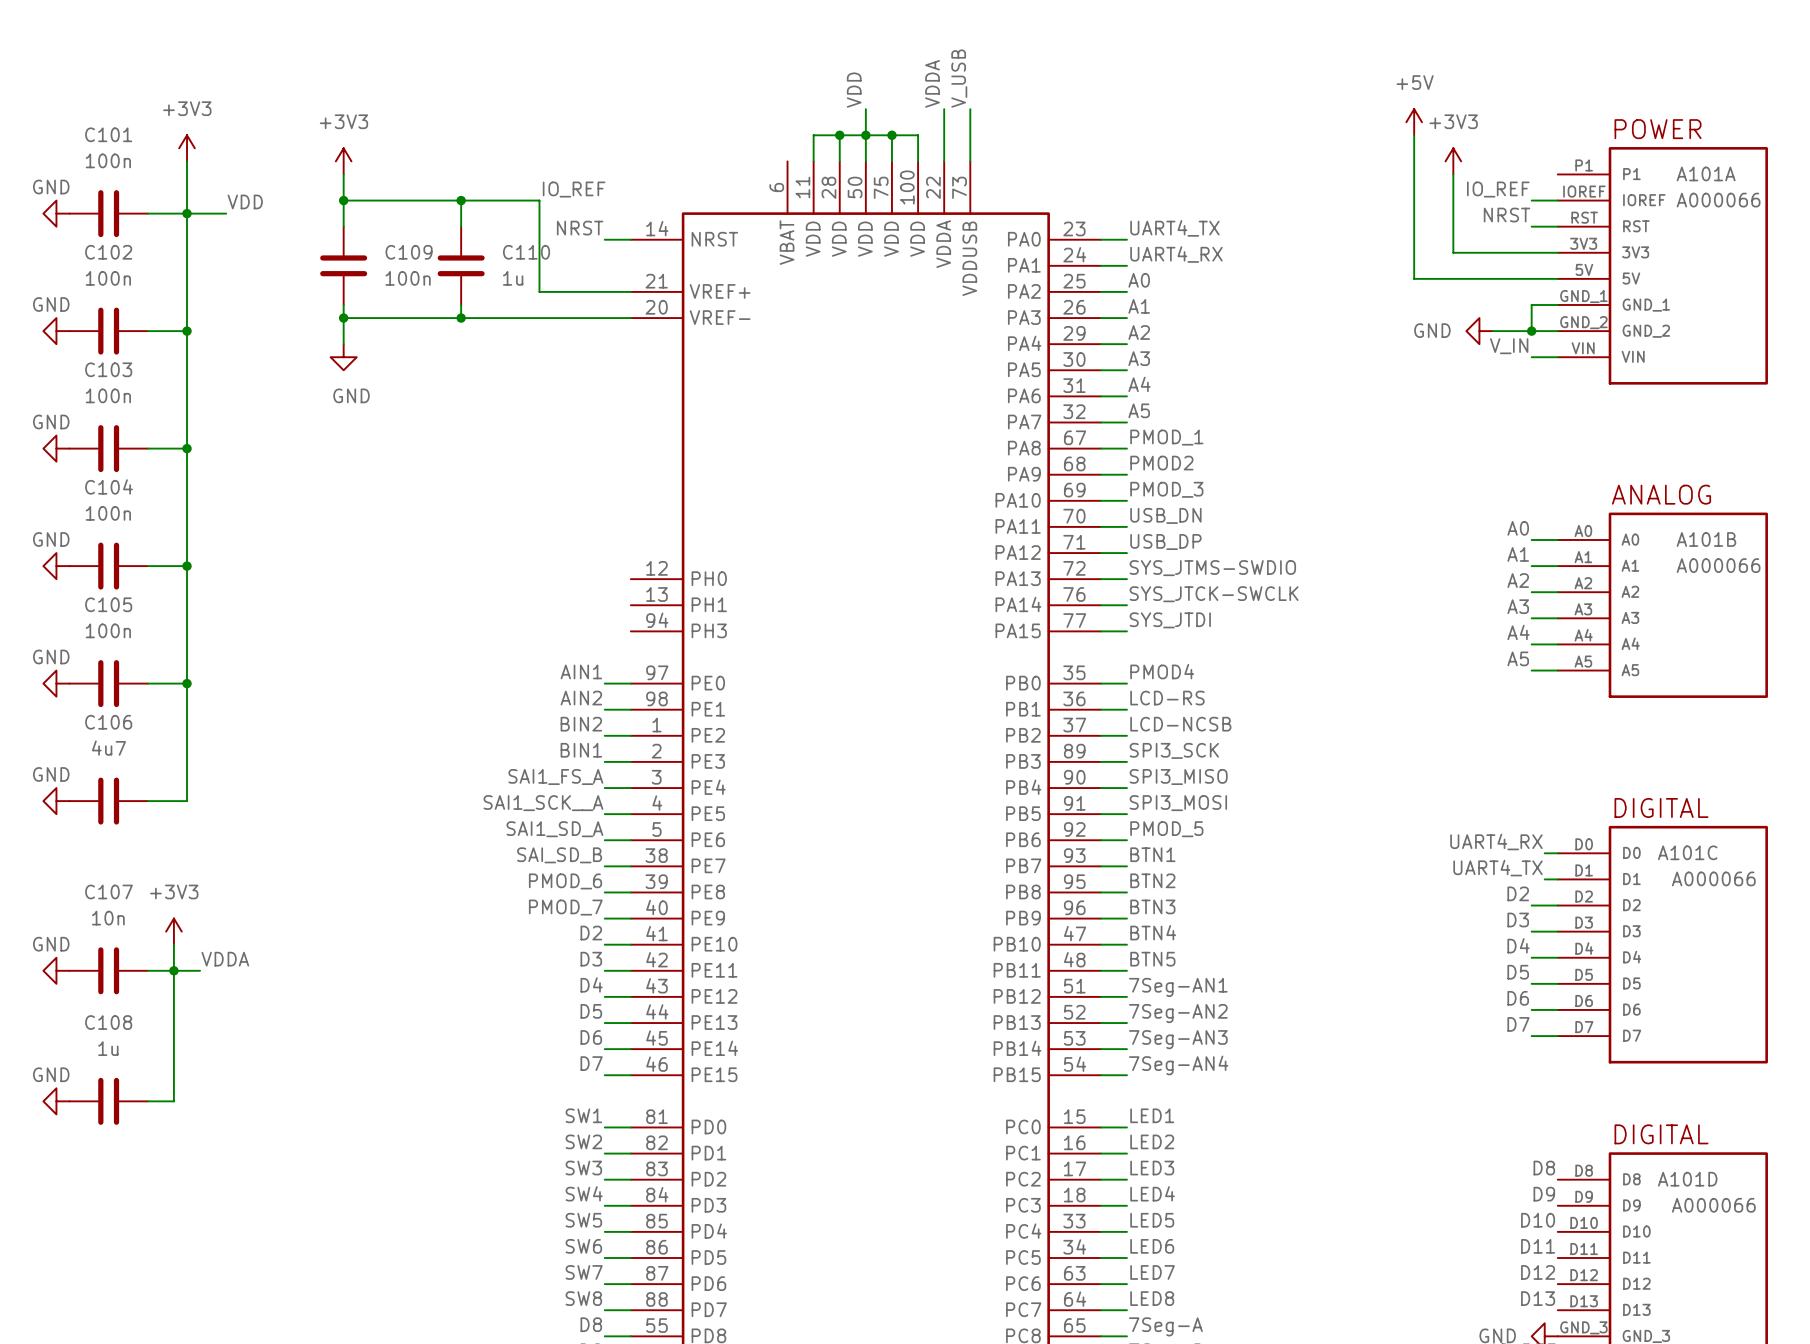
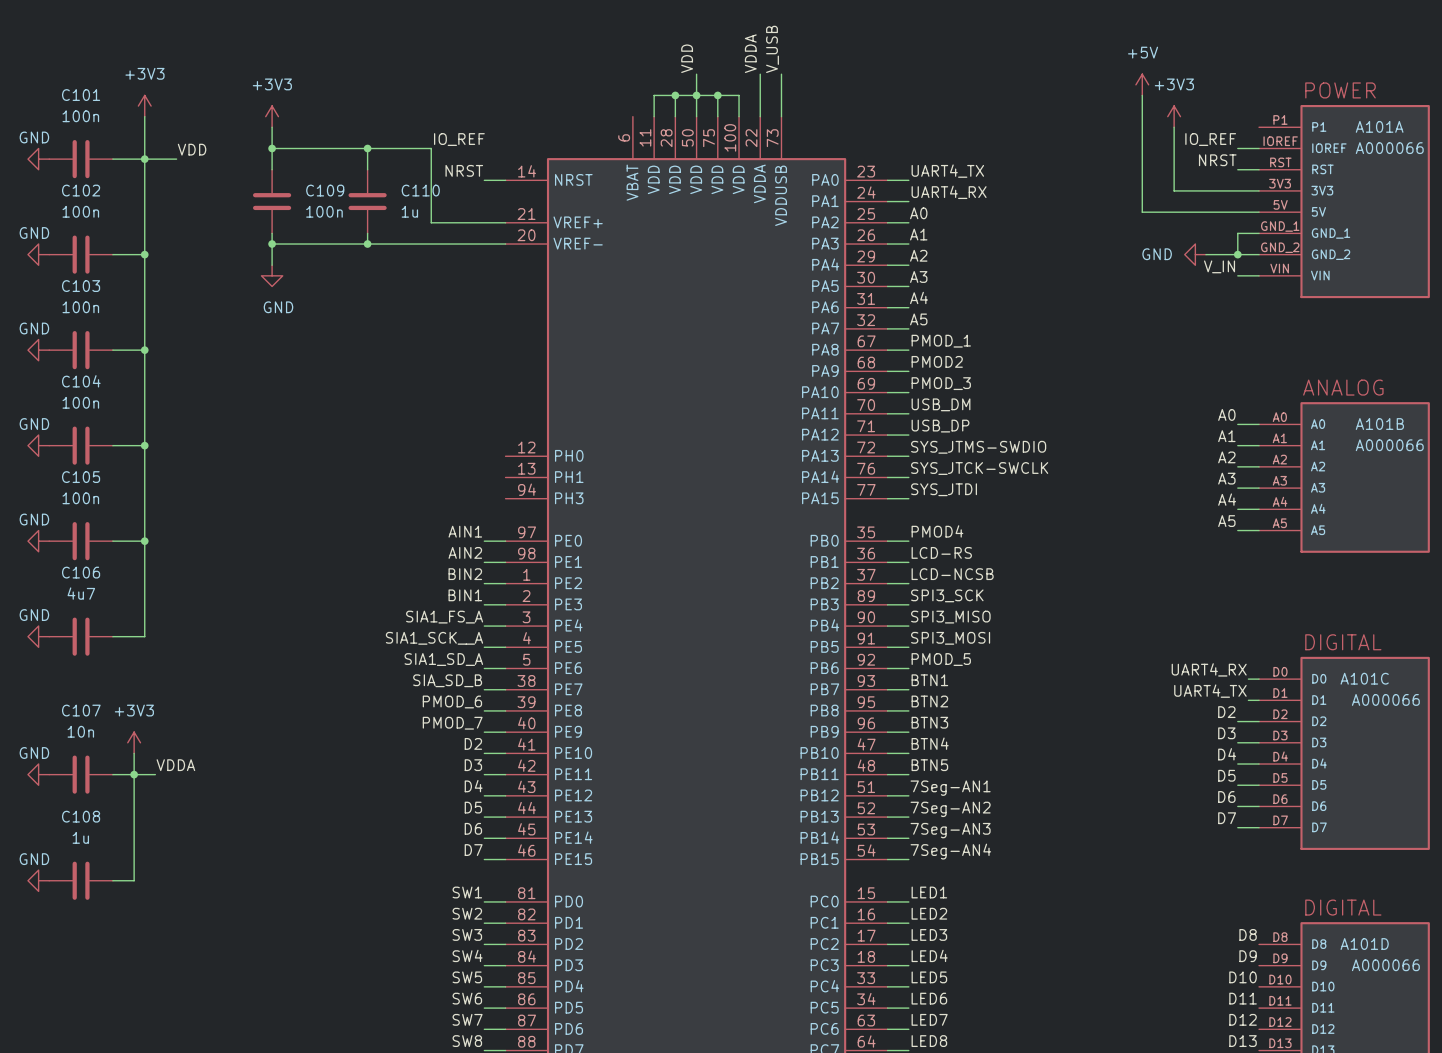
label: USB_DN (1165, 515) -> USB_DM (940, 404)
label: SAI1_FS_A (555, 777) -> SIA1_FS_A (444, 617)
label: SAI1_SCK__A (543, 803) -> SIA1_SCK__A (434, 638)
label: SAI1_SD_A (554, 829) -> SIA1_SD_A (443, 659)
label: SAI_SD_B (559, 855) -> SIA_SD_B (447, 680)

